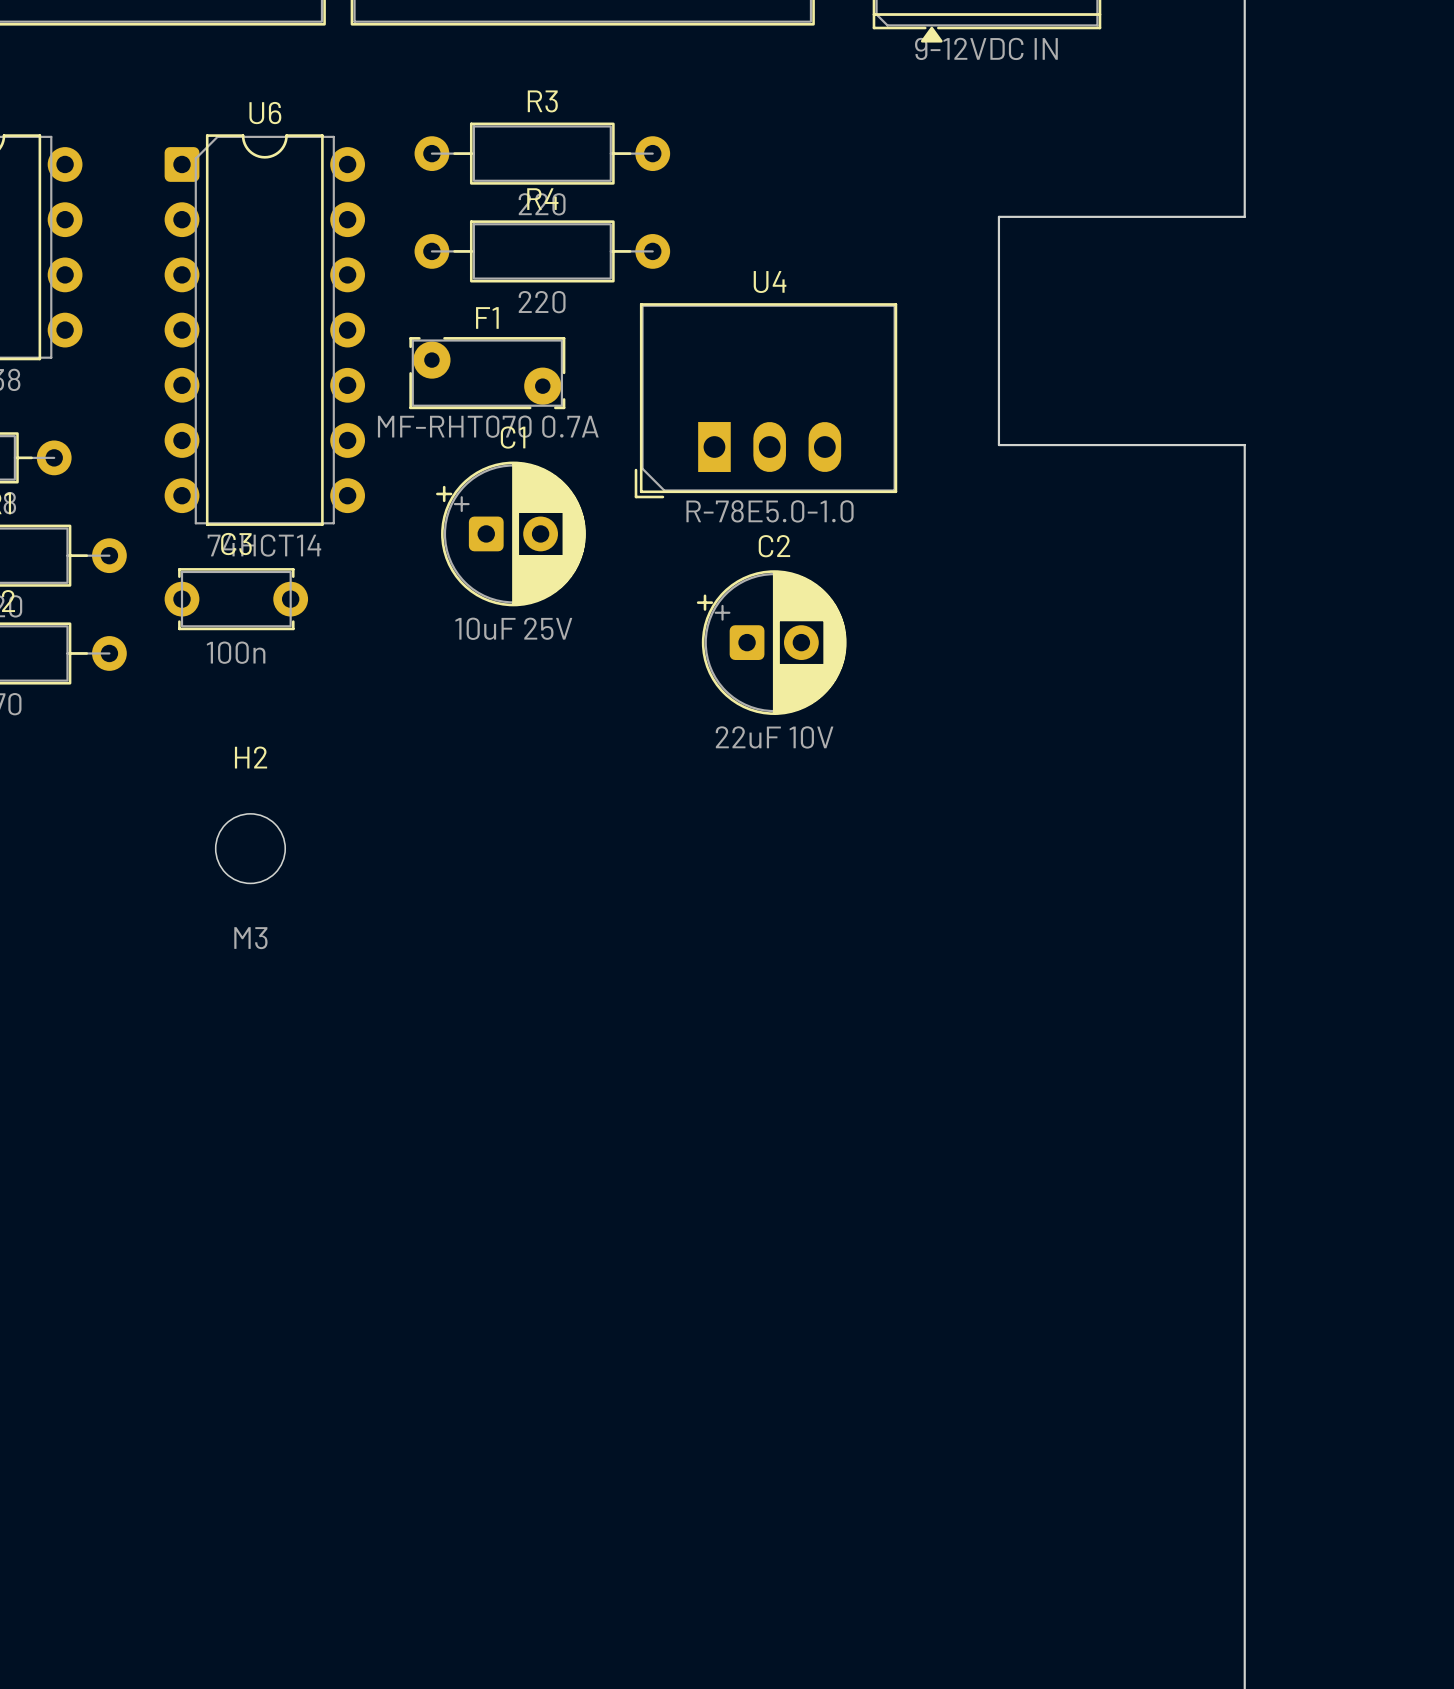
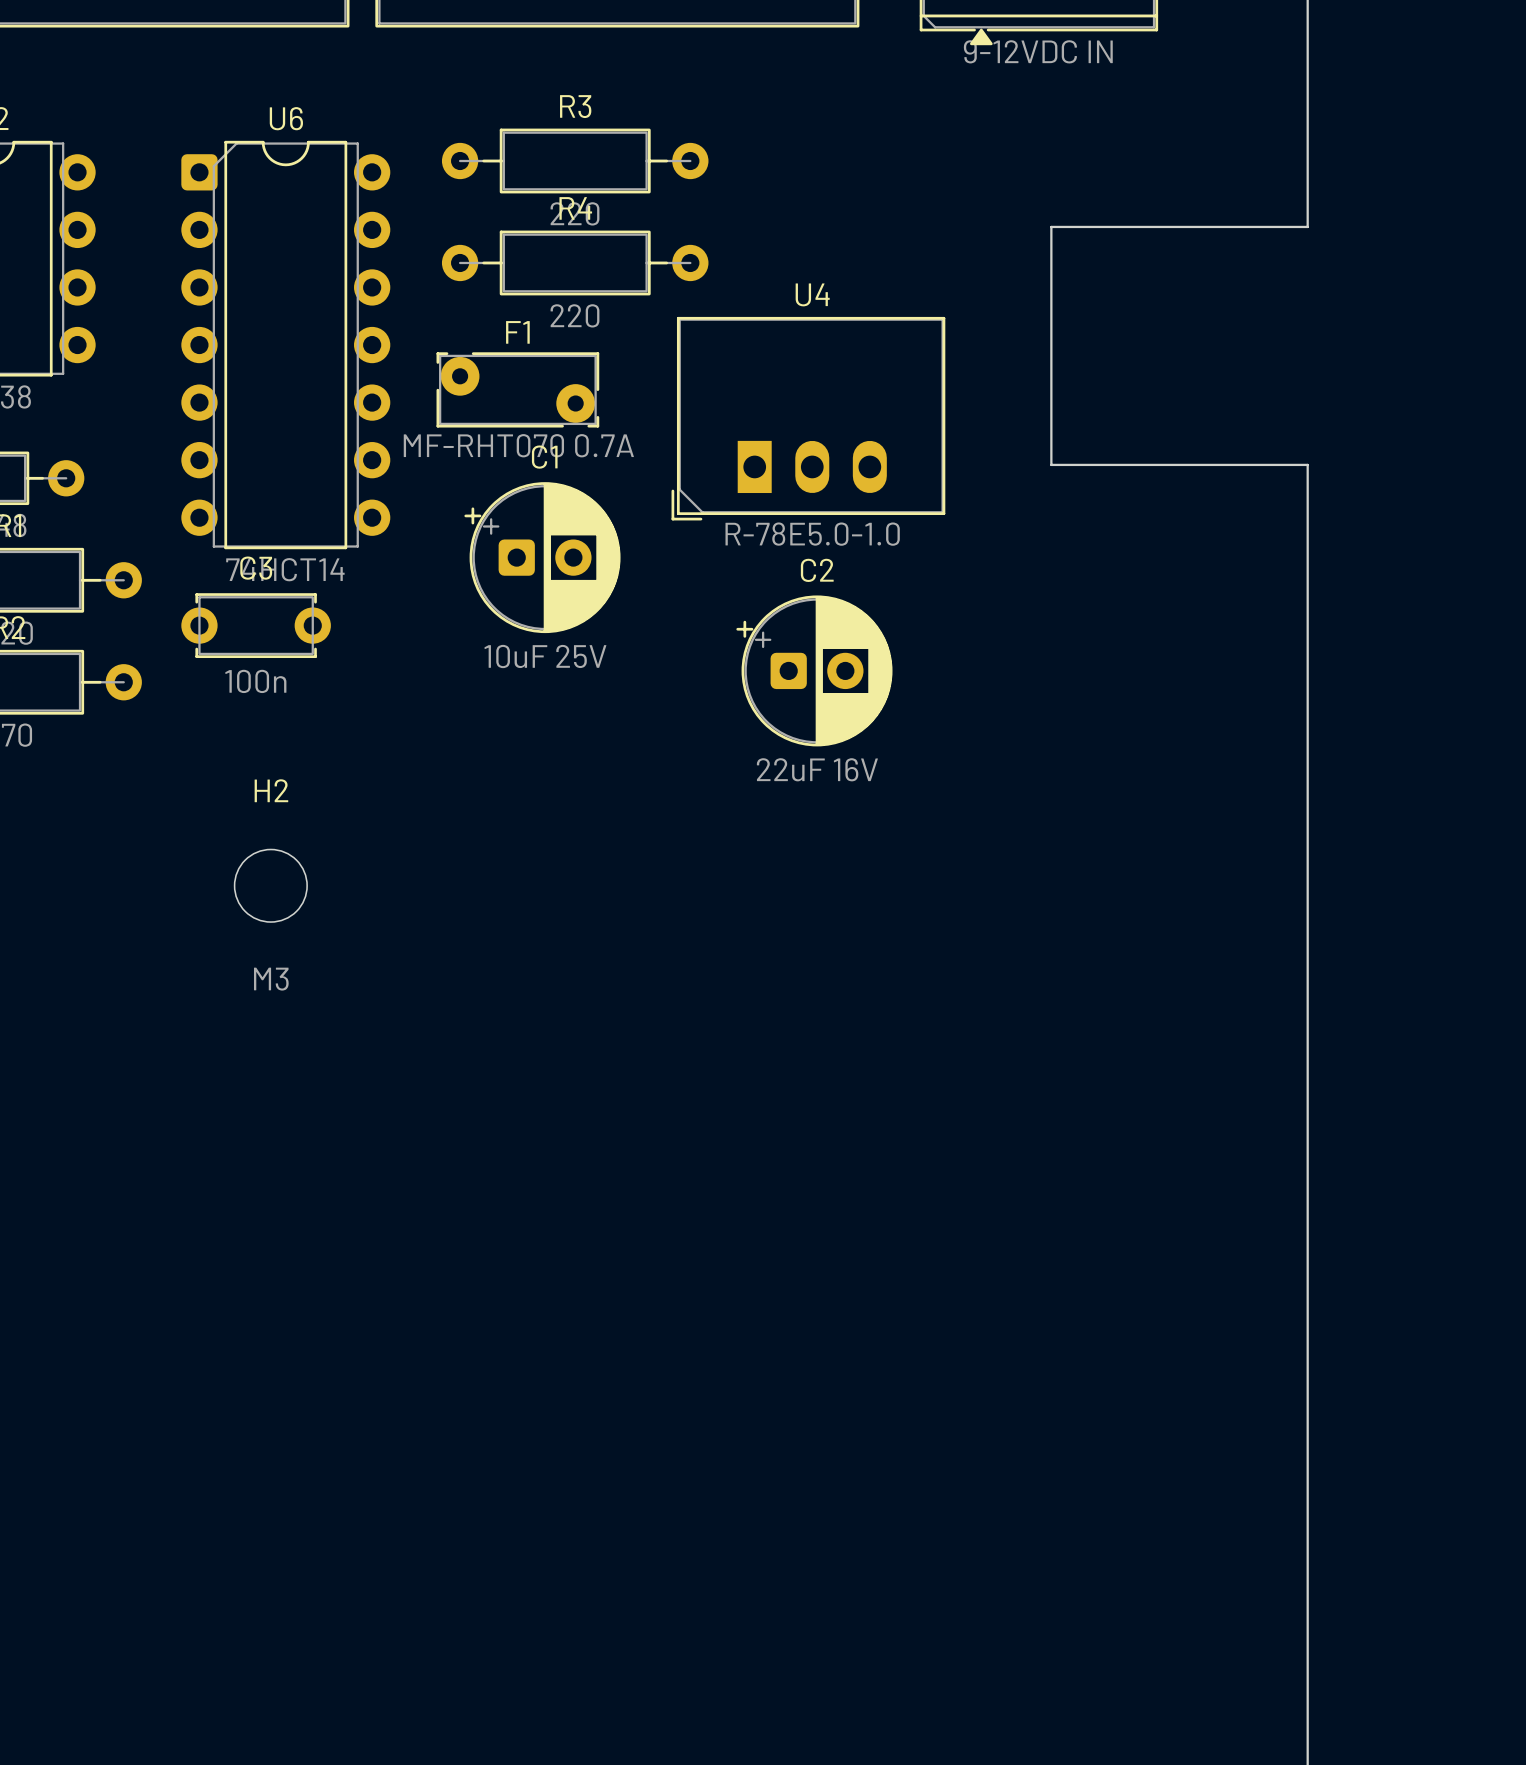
C2 value: 22uF 10V (774, 737) -> 22uF 16V (817, 769)

